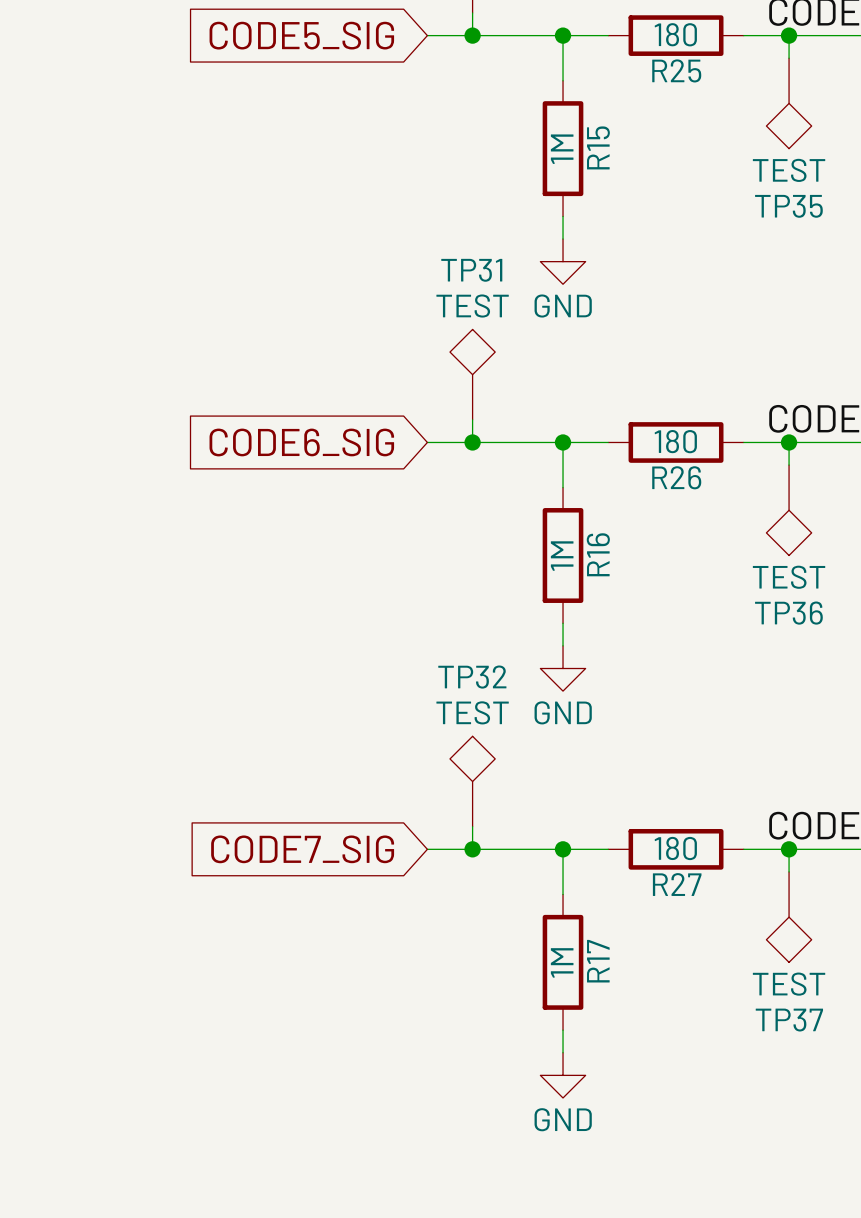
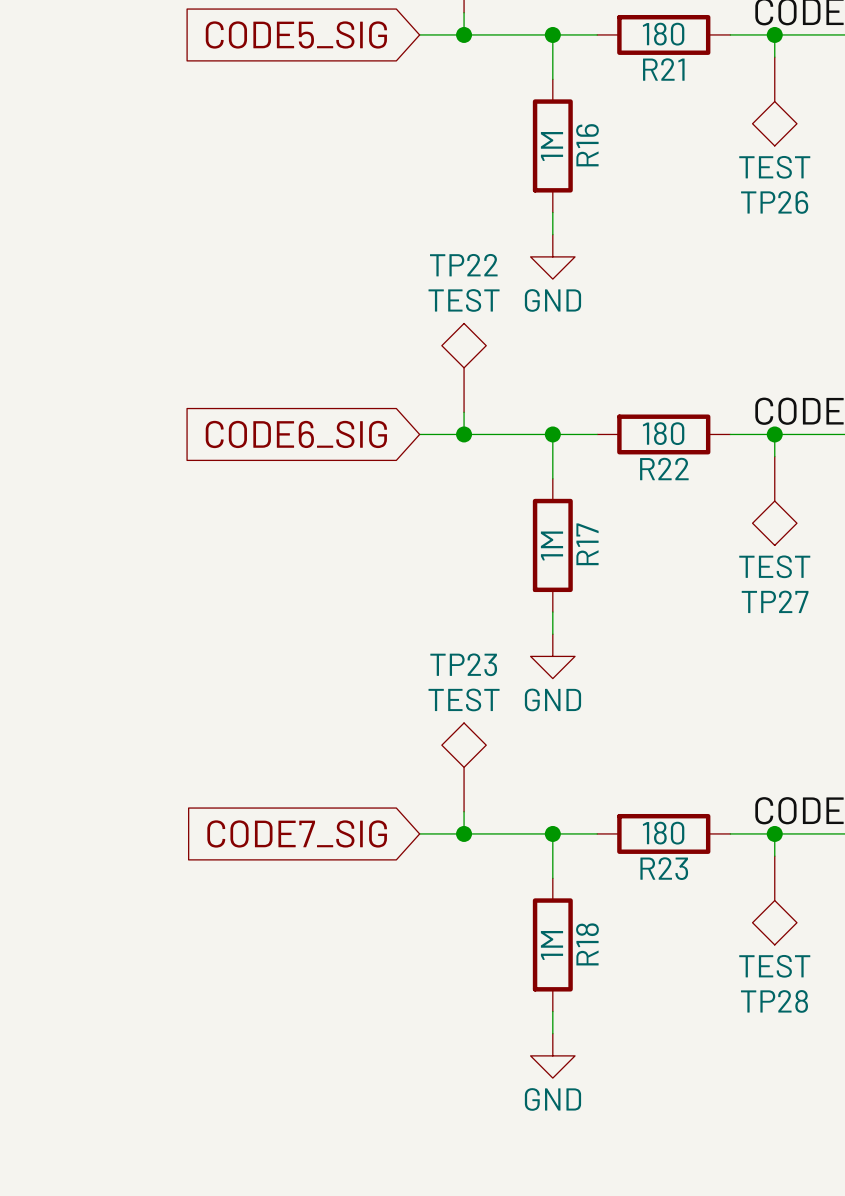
R25 name: R25 (676, 70) -> R21 (663, 69)
R15 name: R15 (598, 147) -> R16 (587, 145)
TP35 name: TP35 (788, 206) -> TP26 (774, 202)
TP31 name: TP31 (471, 270) -> TP22 (463, 265)
R26 name: R26 (676, 477) -> R22 (664, 469)
R16 name: R16 (598, 554) -> R17 (587, 544)
TP36 name: TP36 (788, 613) -> TP27 (775, 601)
TP32 name: TP32 (472, 677) -> TP23 (463, 664)
R27 name: R27 (677, 884) -> R23 (664, 868)
R17 name: R17 (598, 961) -> R18 (587, 944)
TP37 name: TP37 (789, 1020) -> TP28 (774, 1001)

